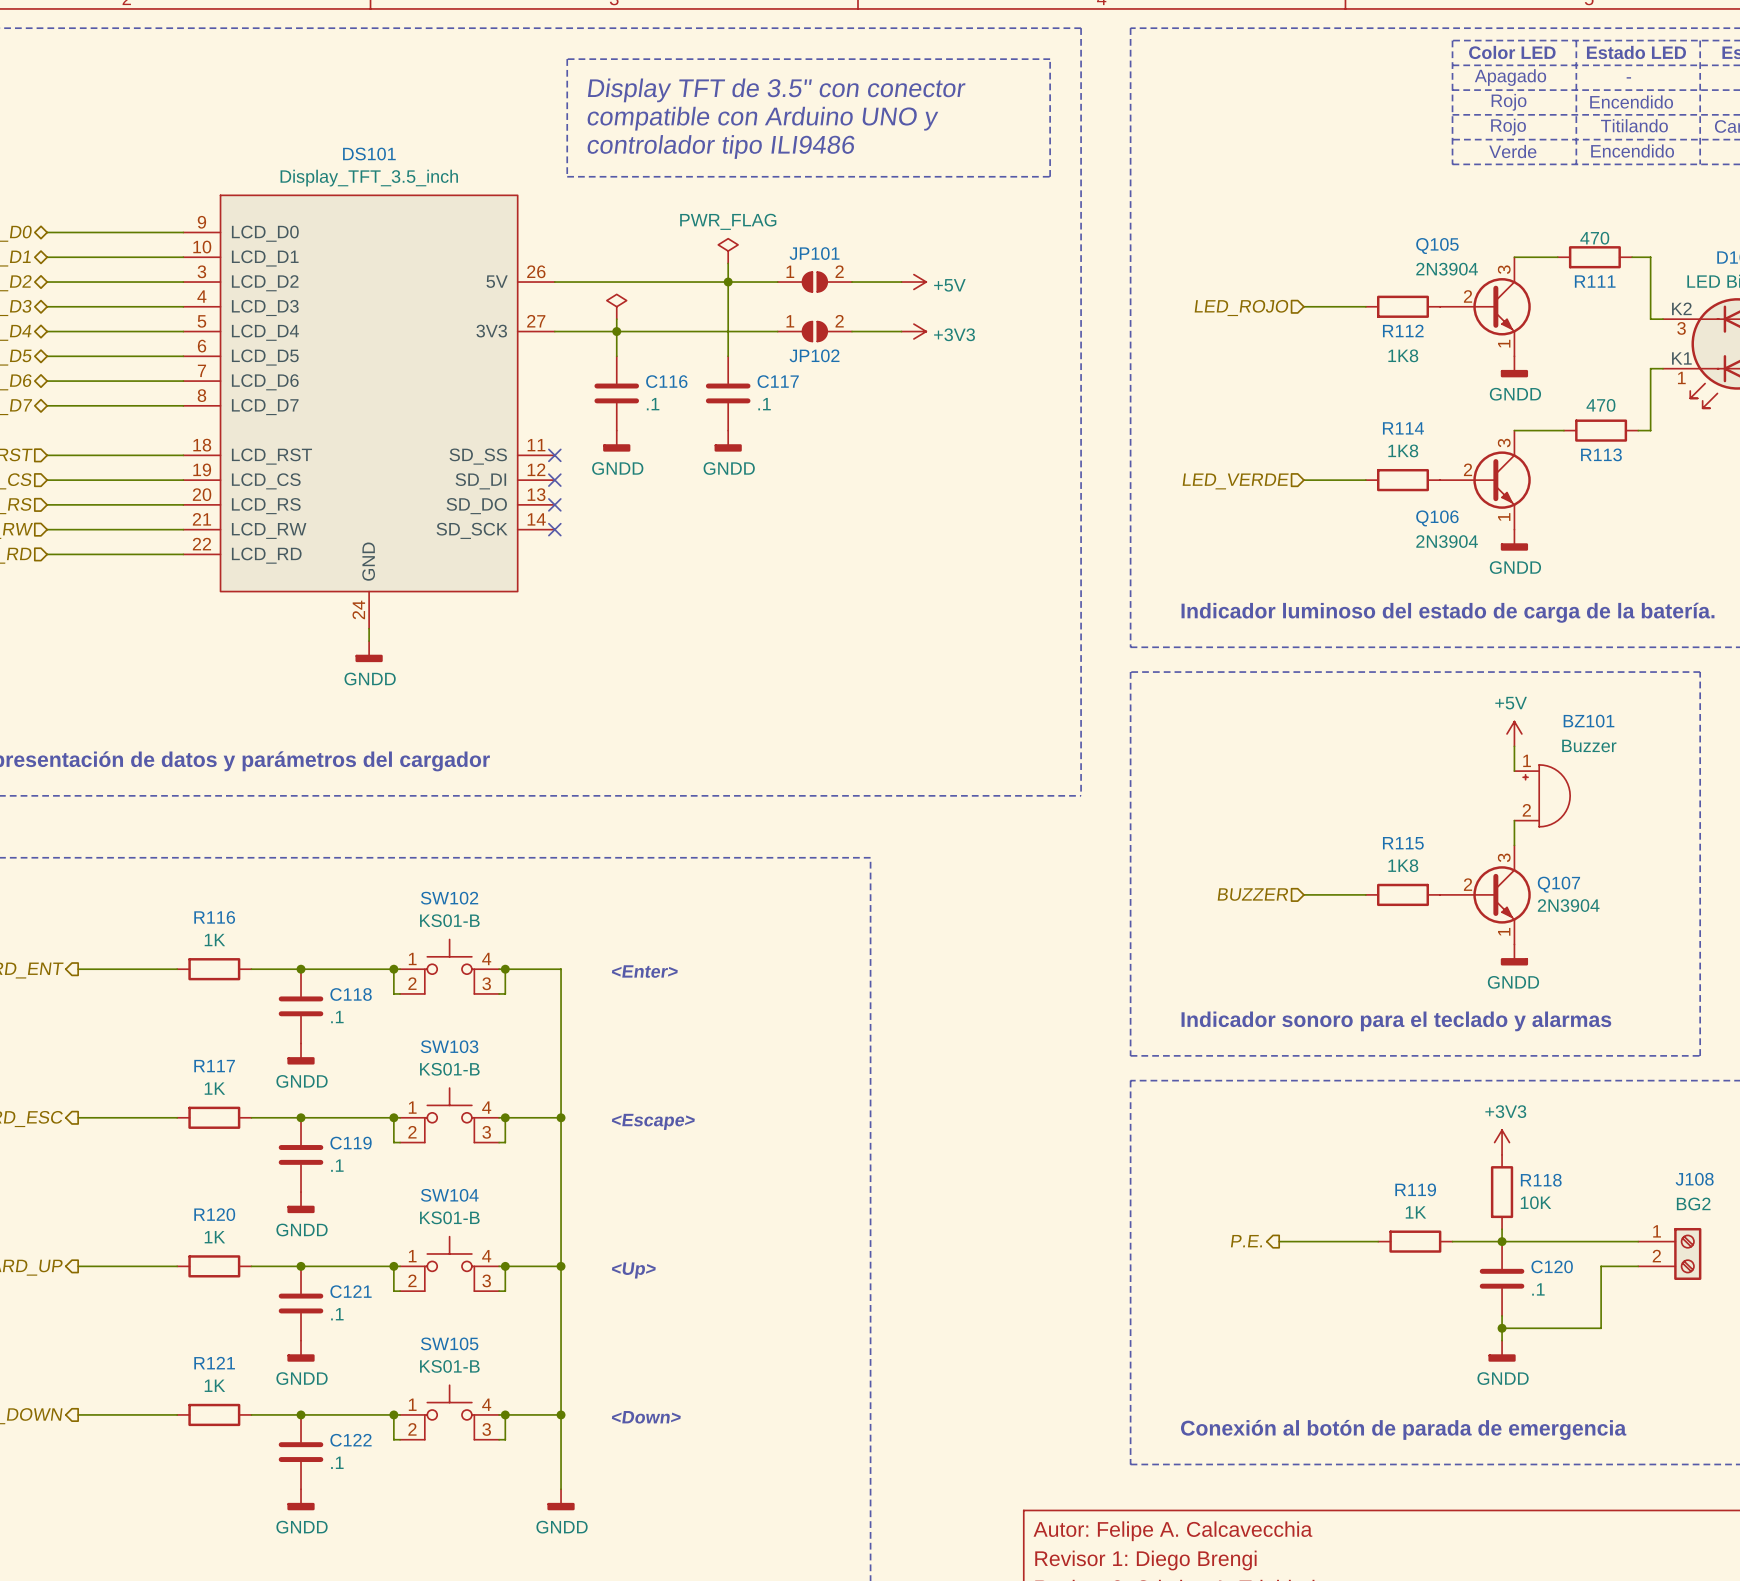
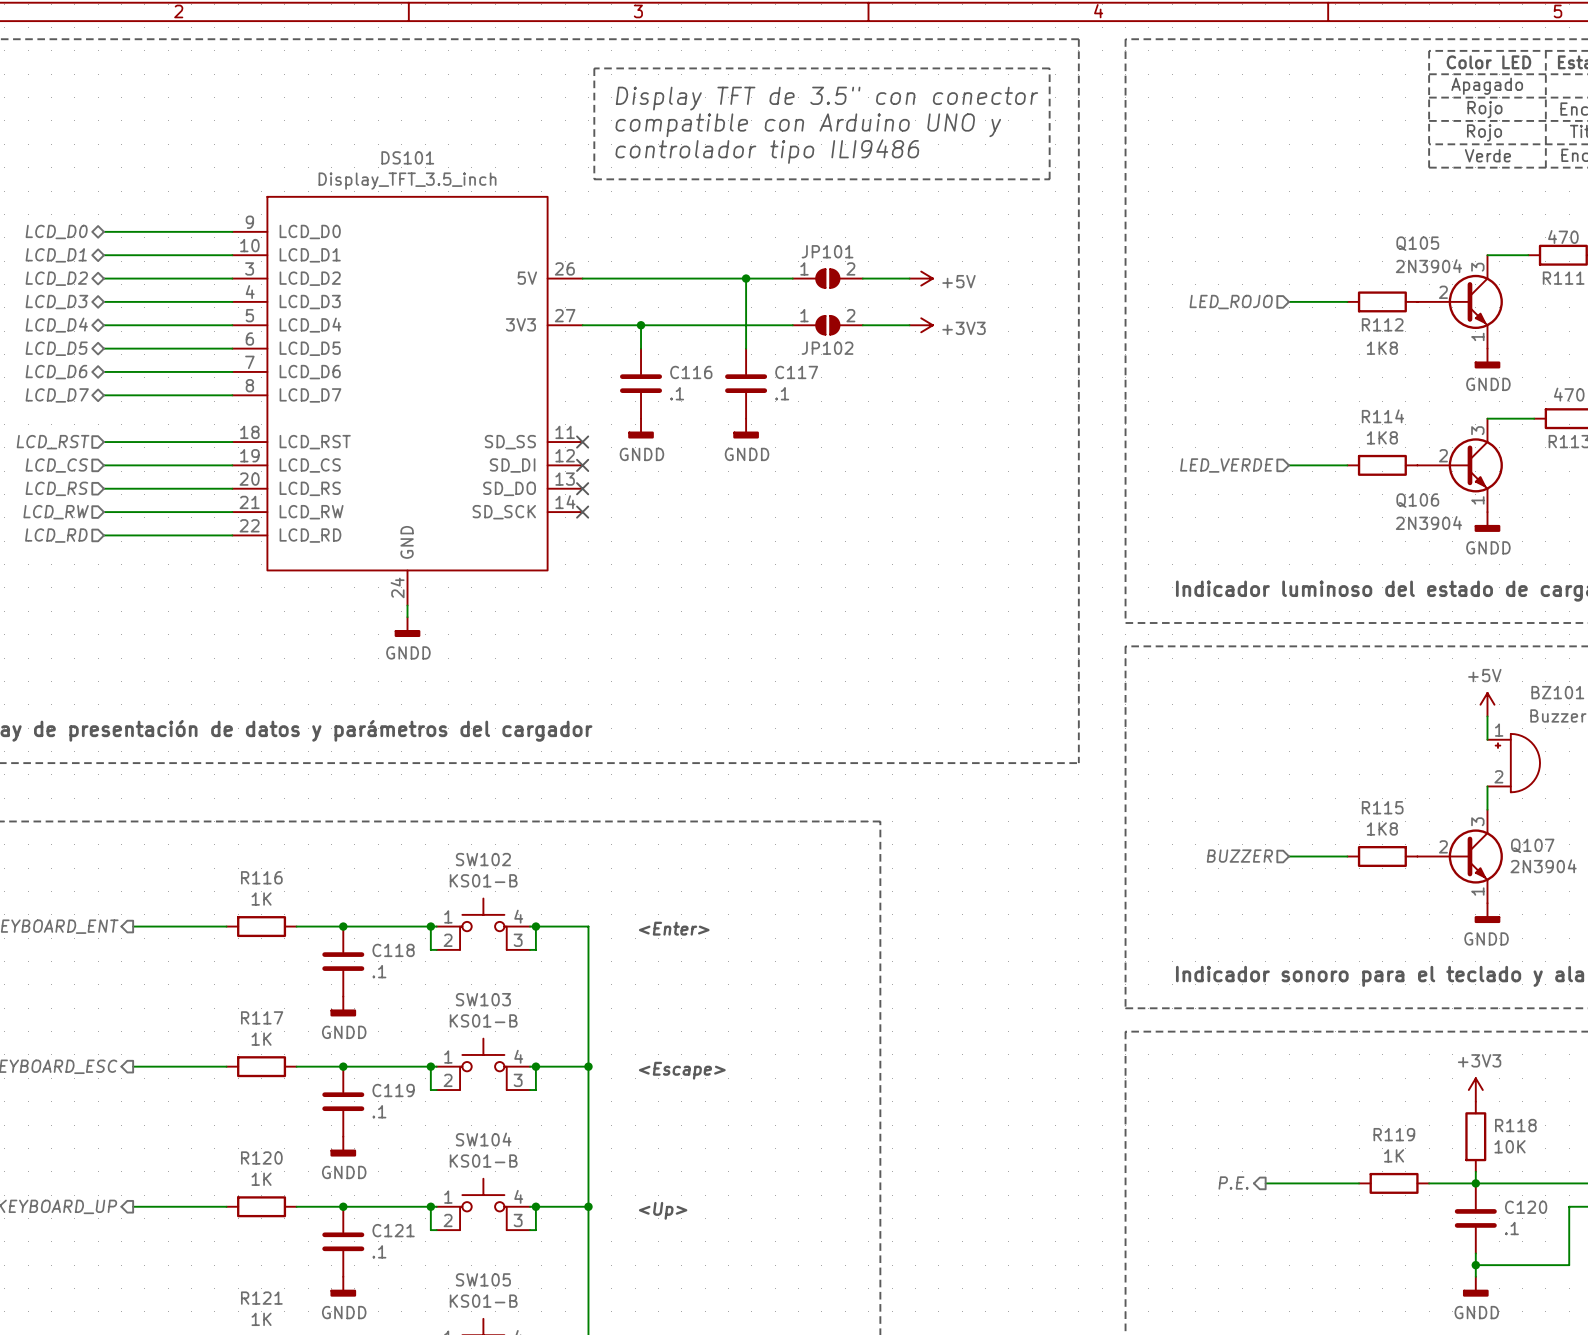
power symbol: PWR_FLAG (728, 251) -> none
wire: (728, 263) (728, 282) -> none
power symbol: (616, 306) -> none
wire: (616, 319) (616, 331) -> none

